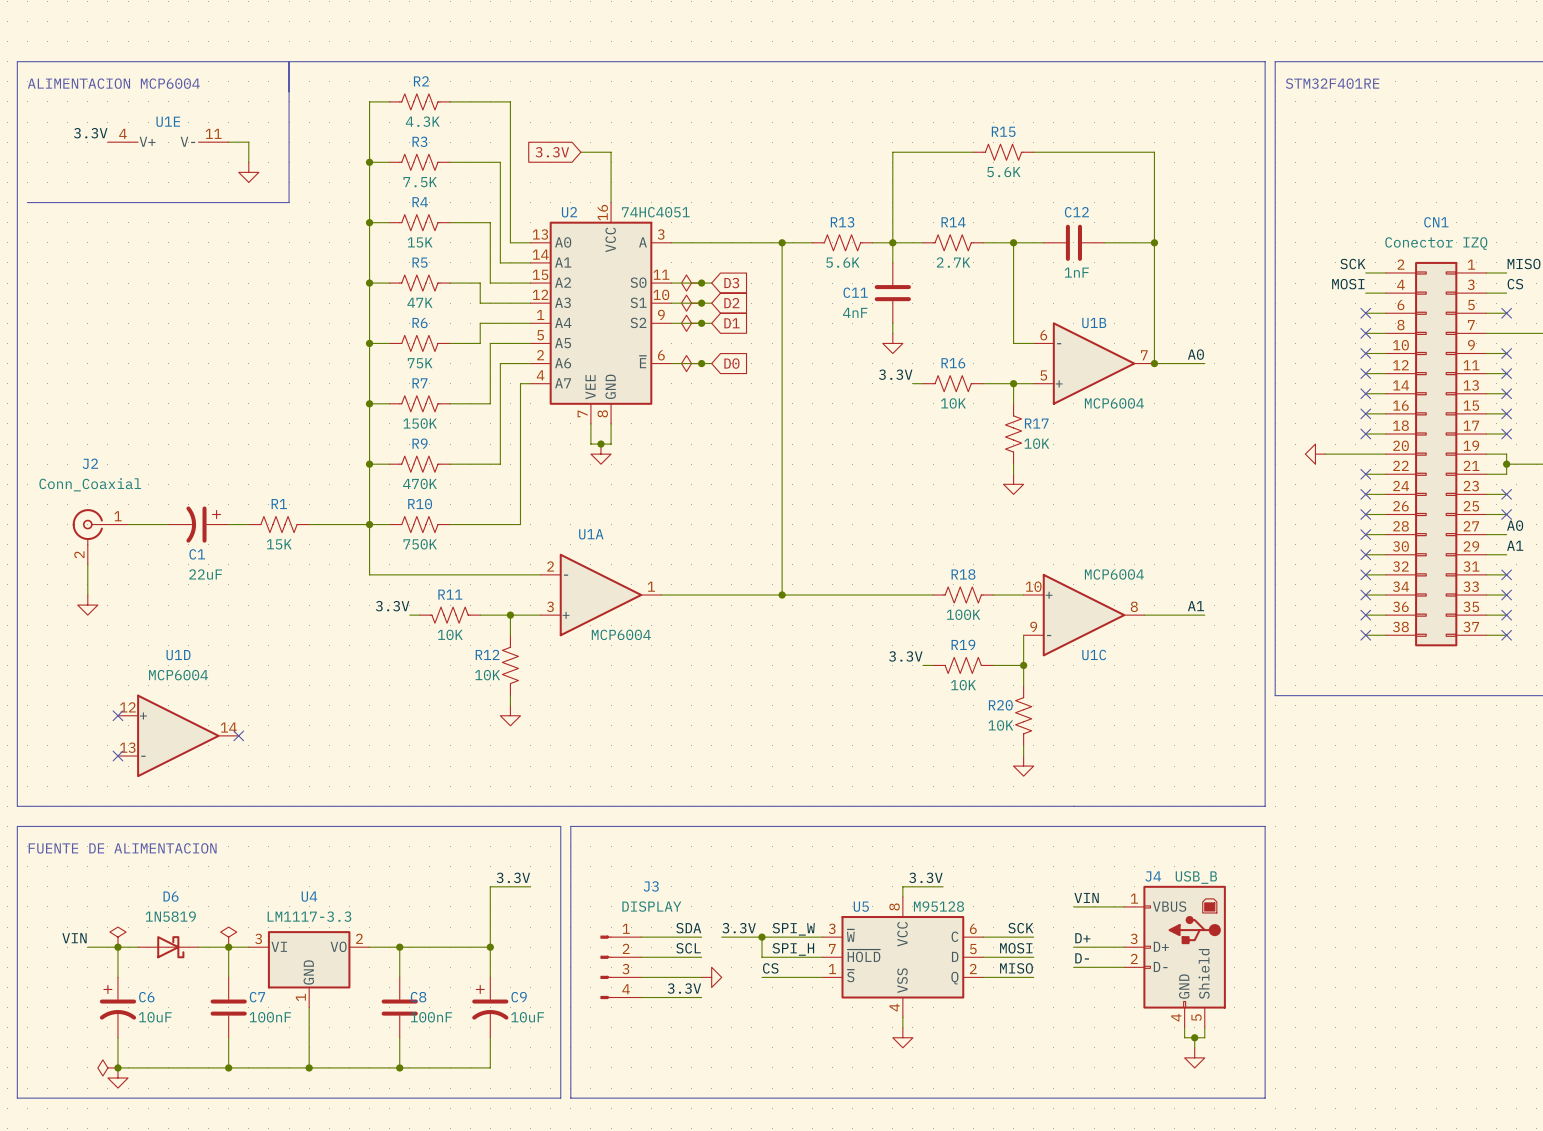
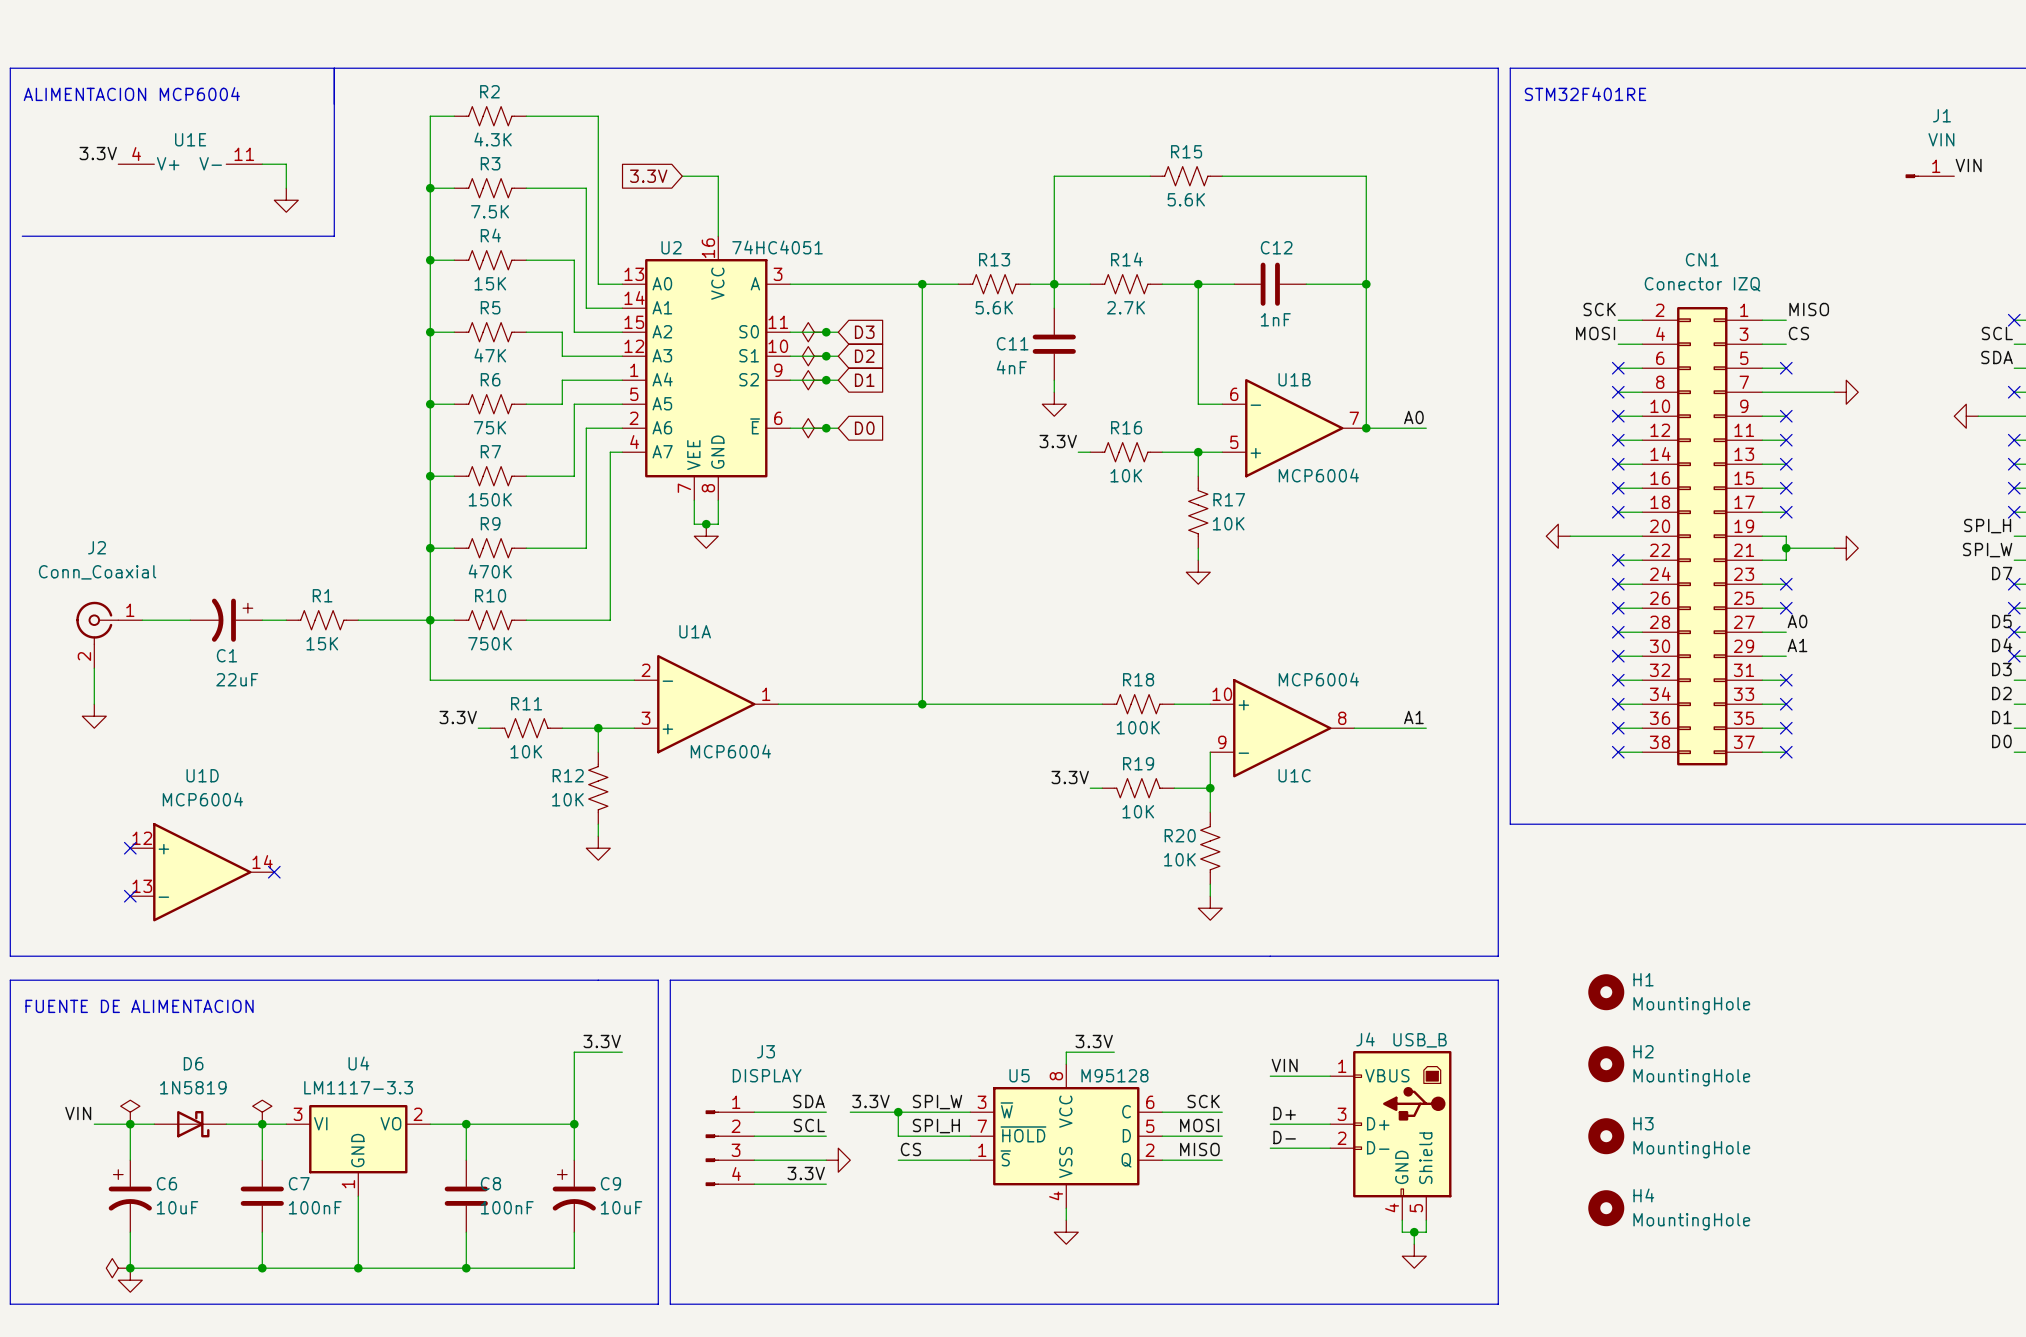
H1: none -> MountingHole (1606, 992)
H2: none -> MountingHole (1606, 1064)
H3: none -> MountingHole (1606, 1136)
H4: none -> MountingHole (1606, 1208)

